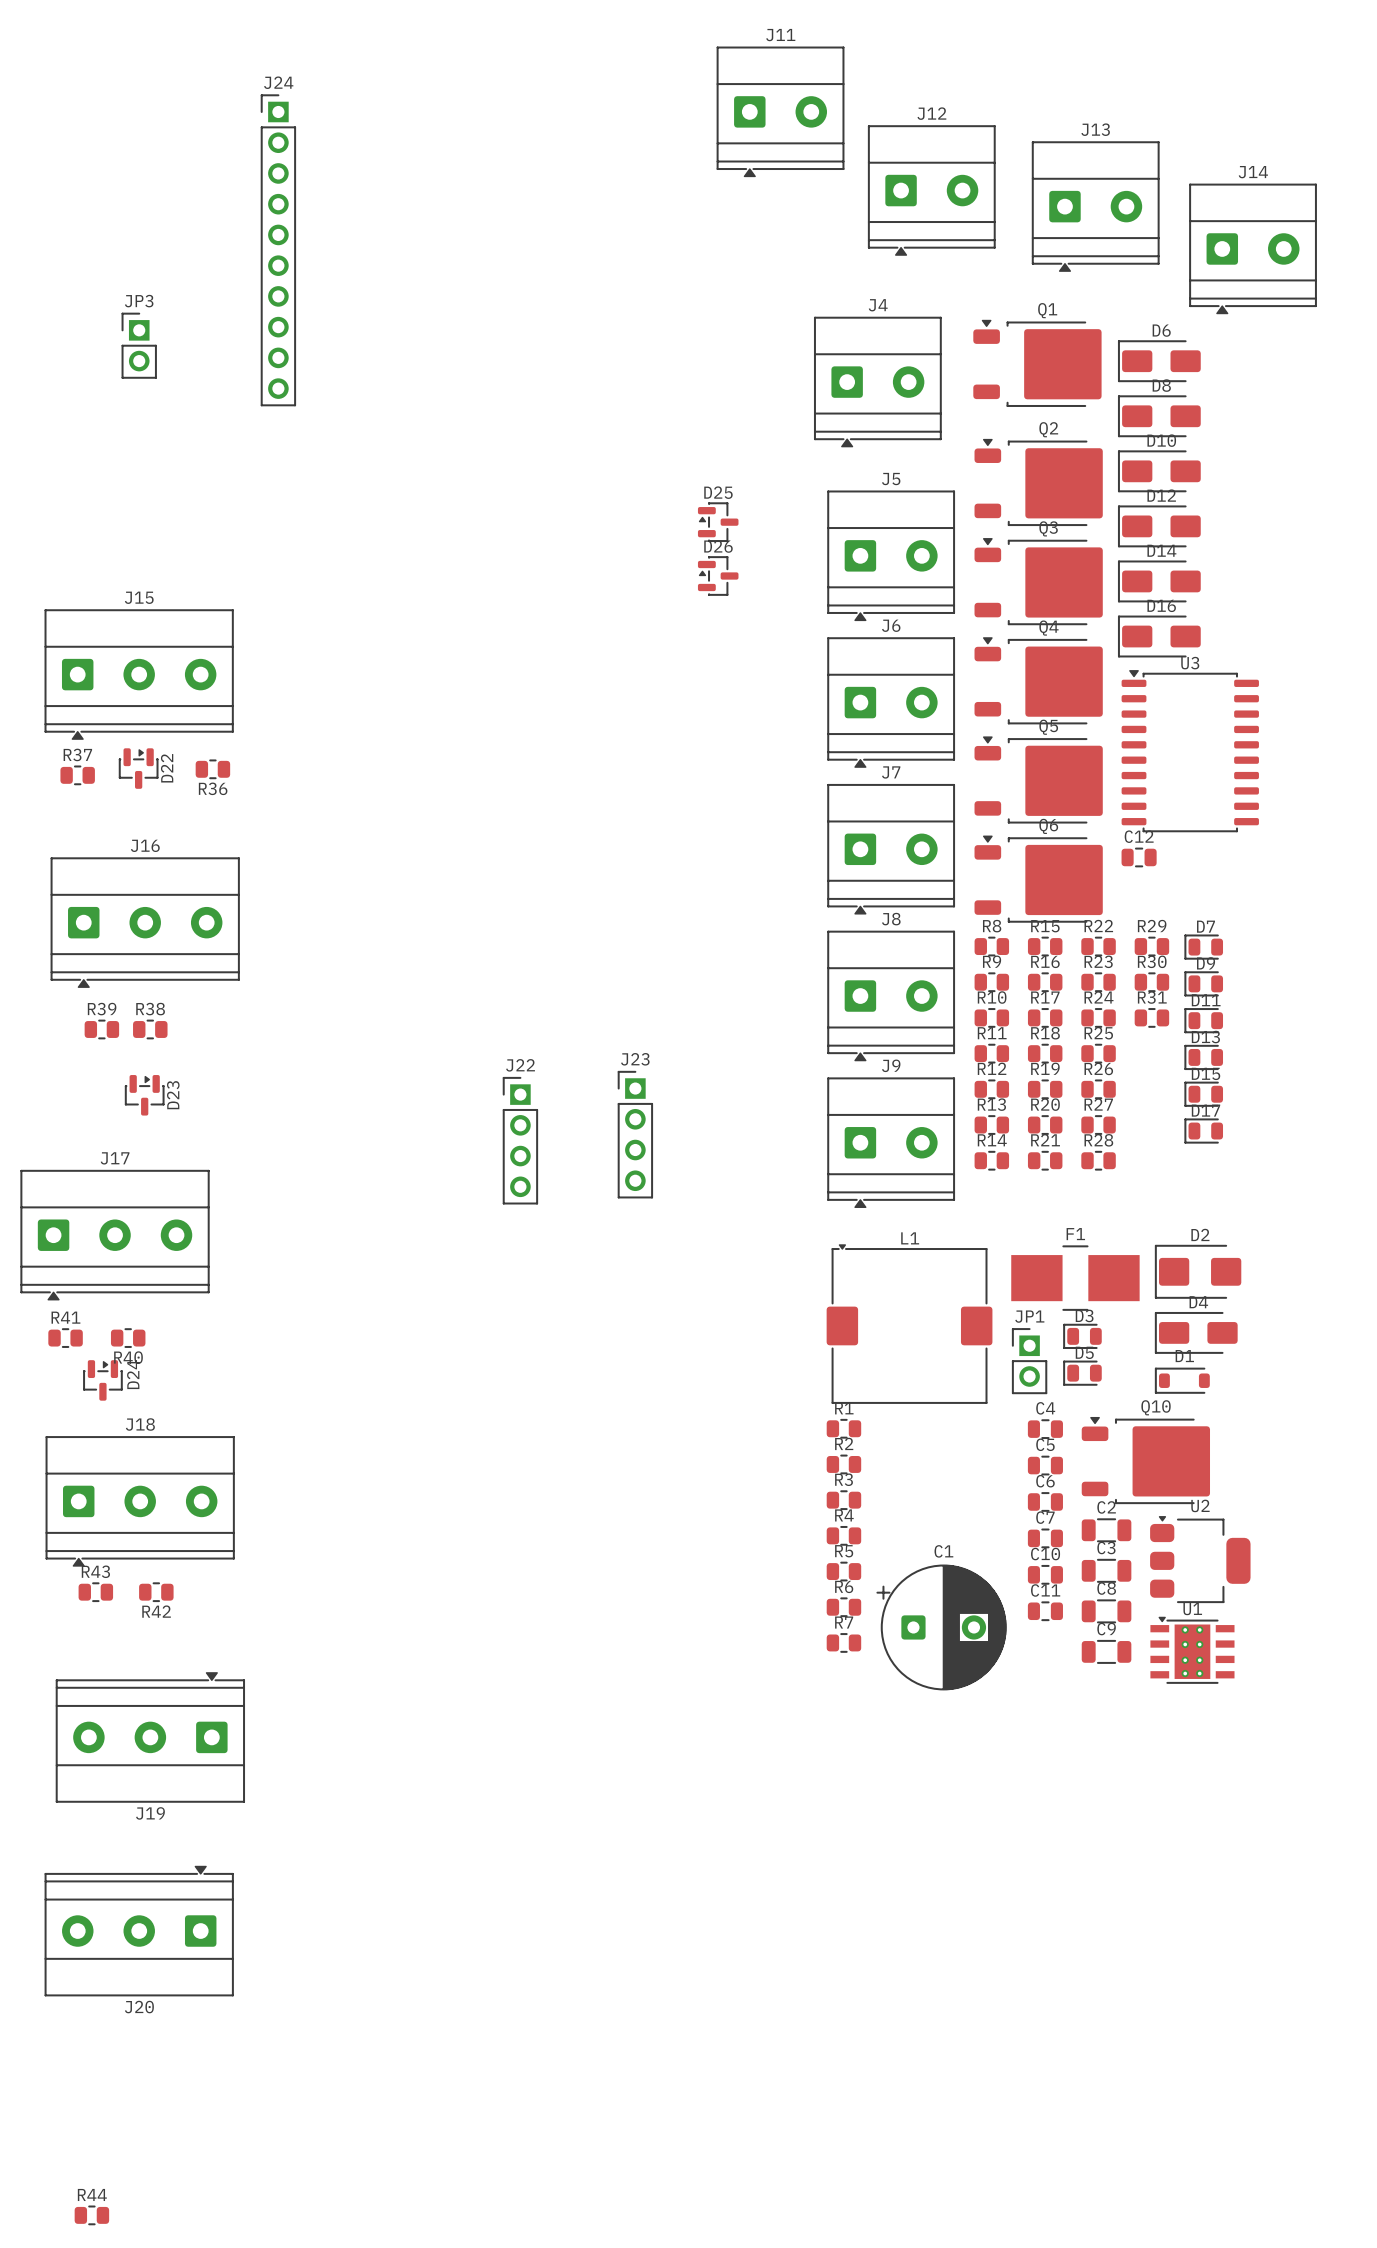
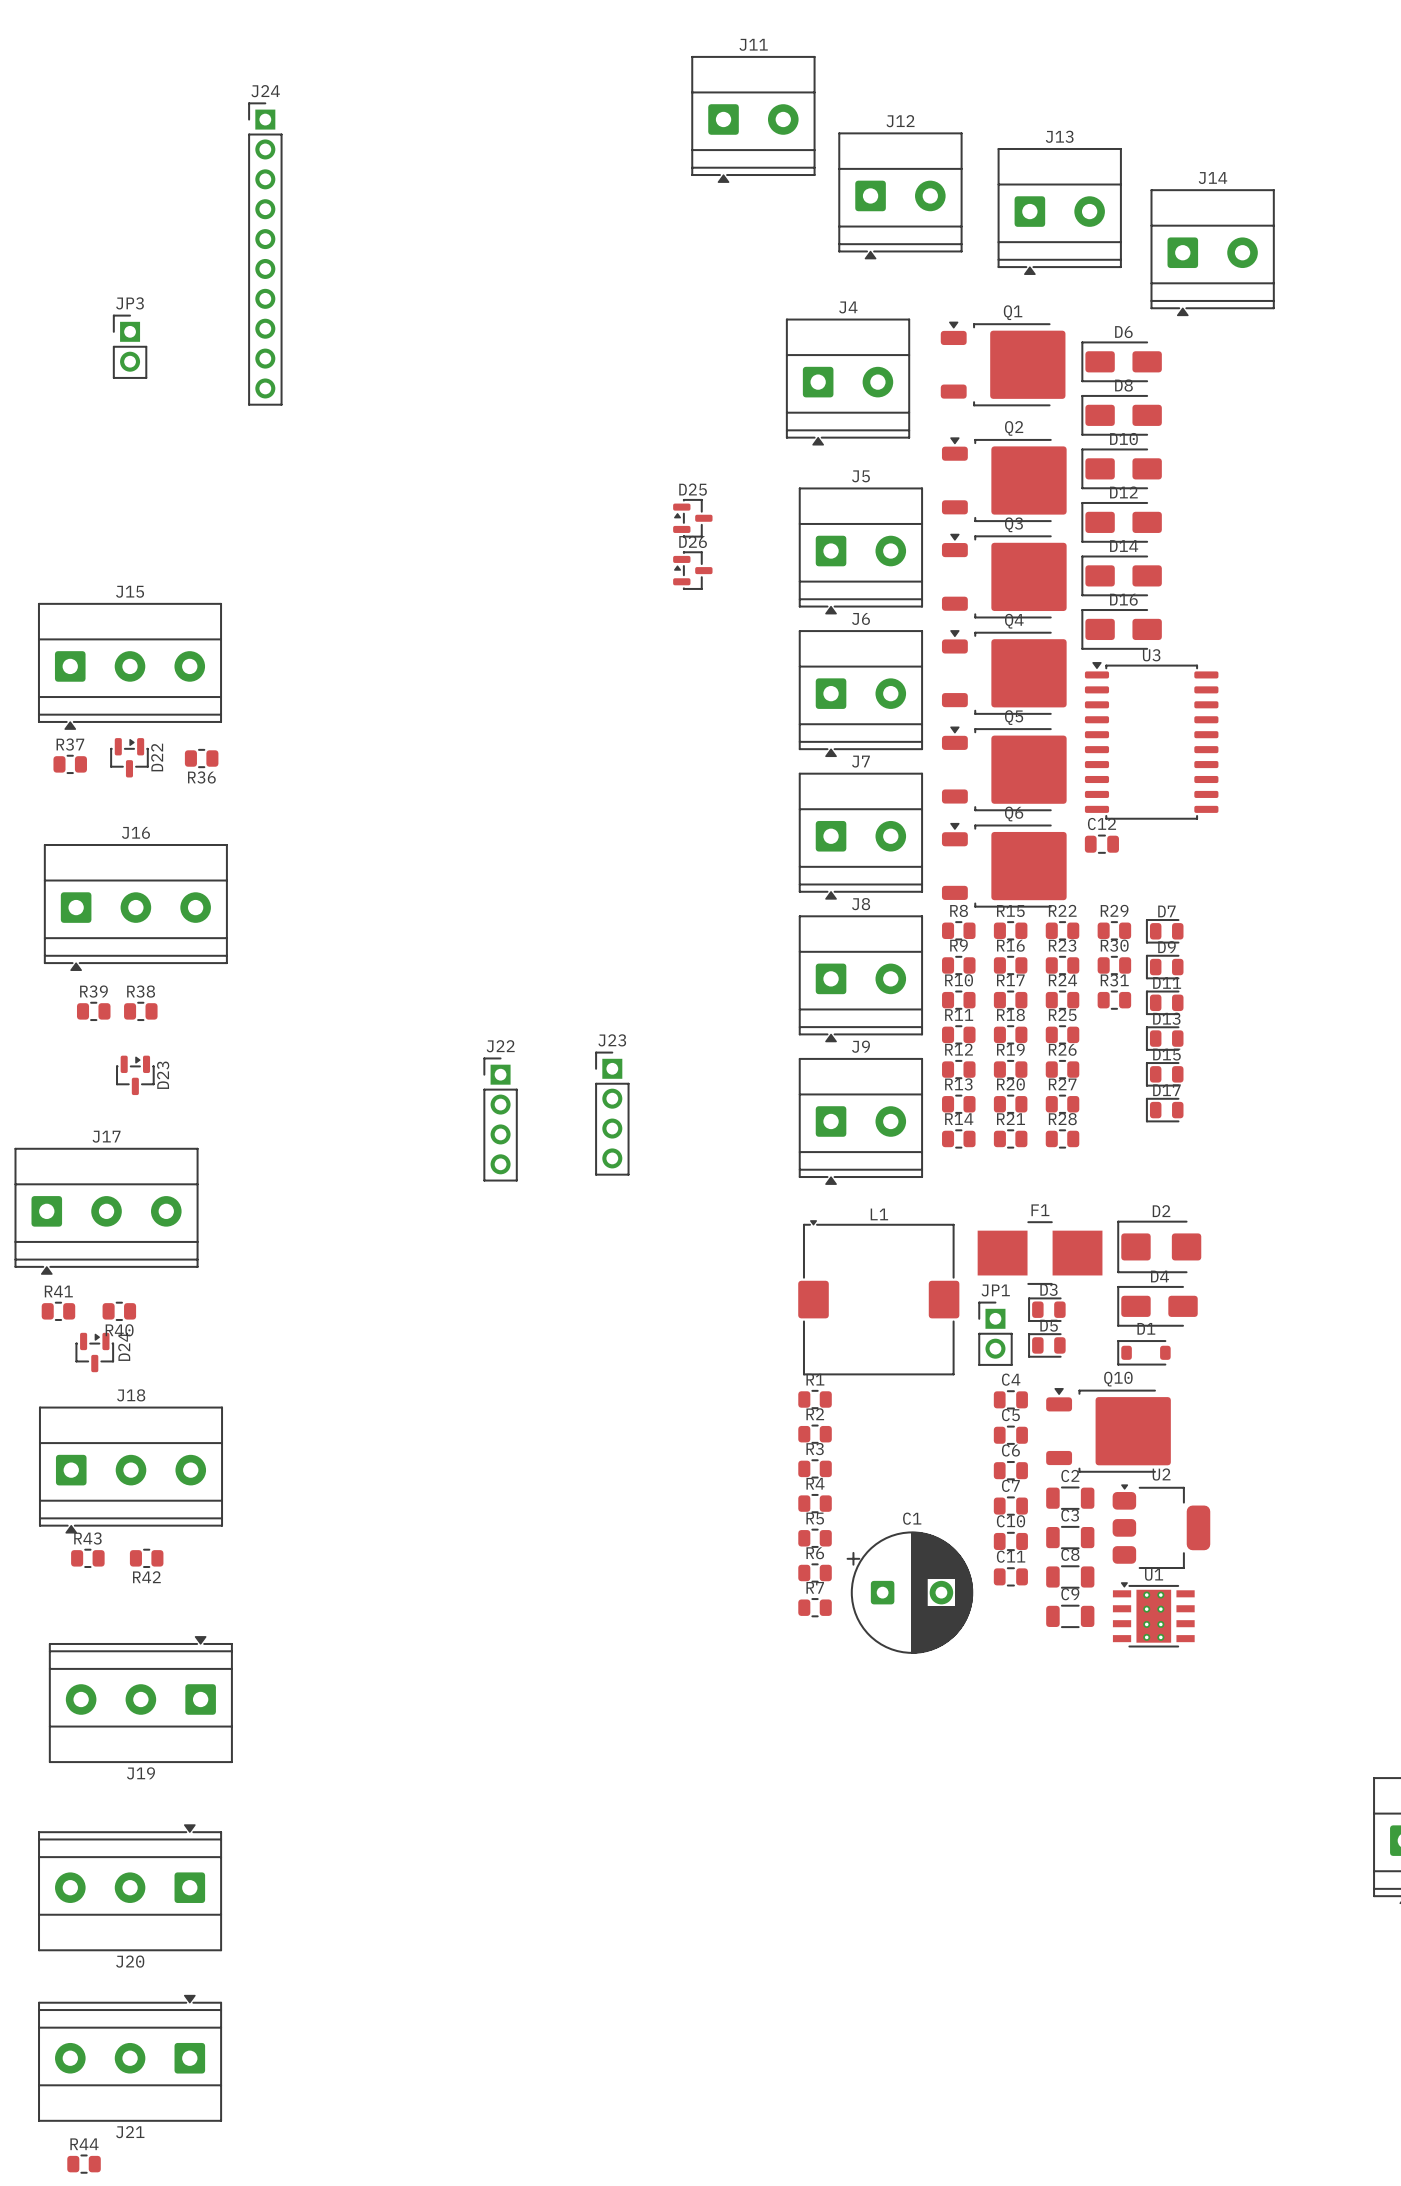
J21: none -> (130, 2058)

